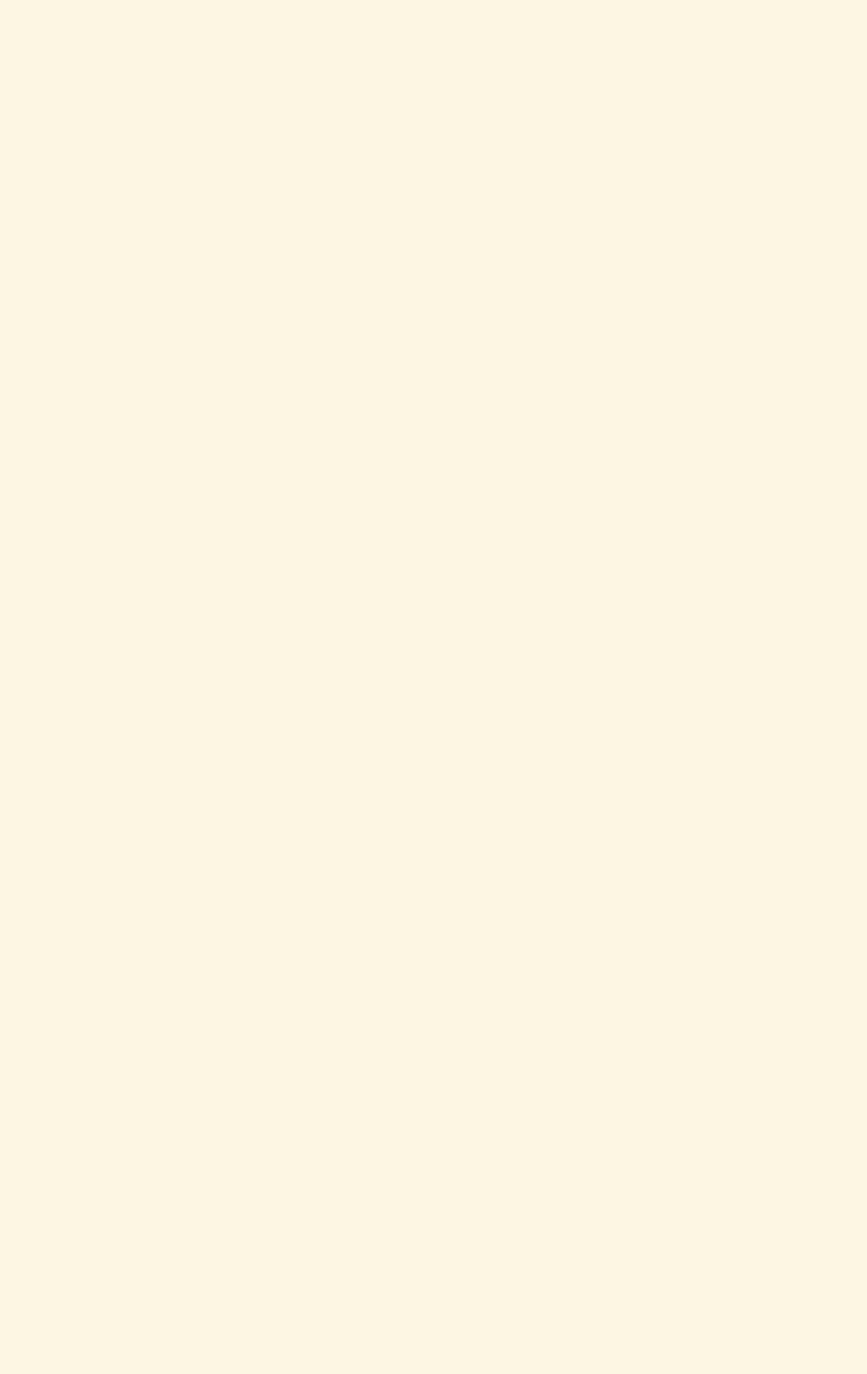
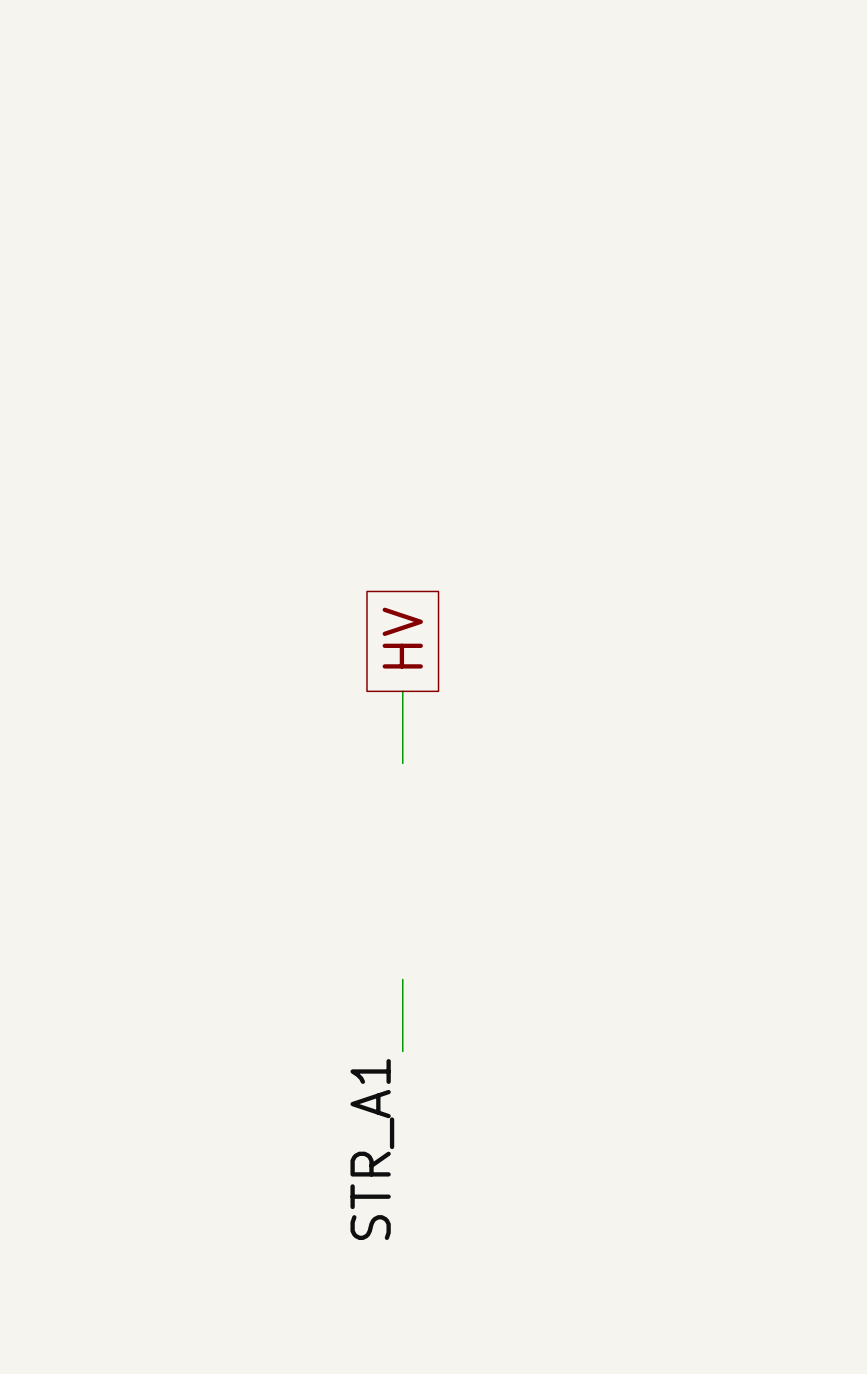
global label: none -> HV (402, 638)
wire: none -> (402, 691) (402, 763)
wire: none -> (402, 979) (402, 1051)
label: none -> STR_A1 (372, 1149)

